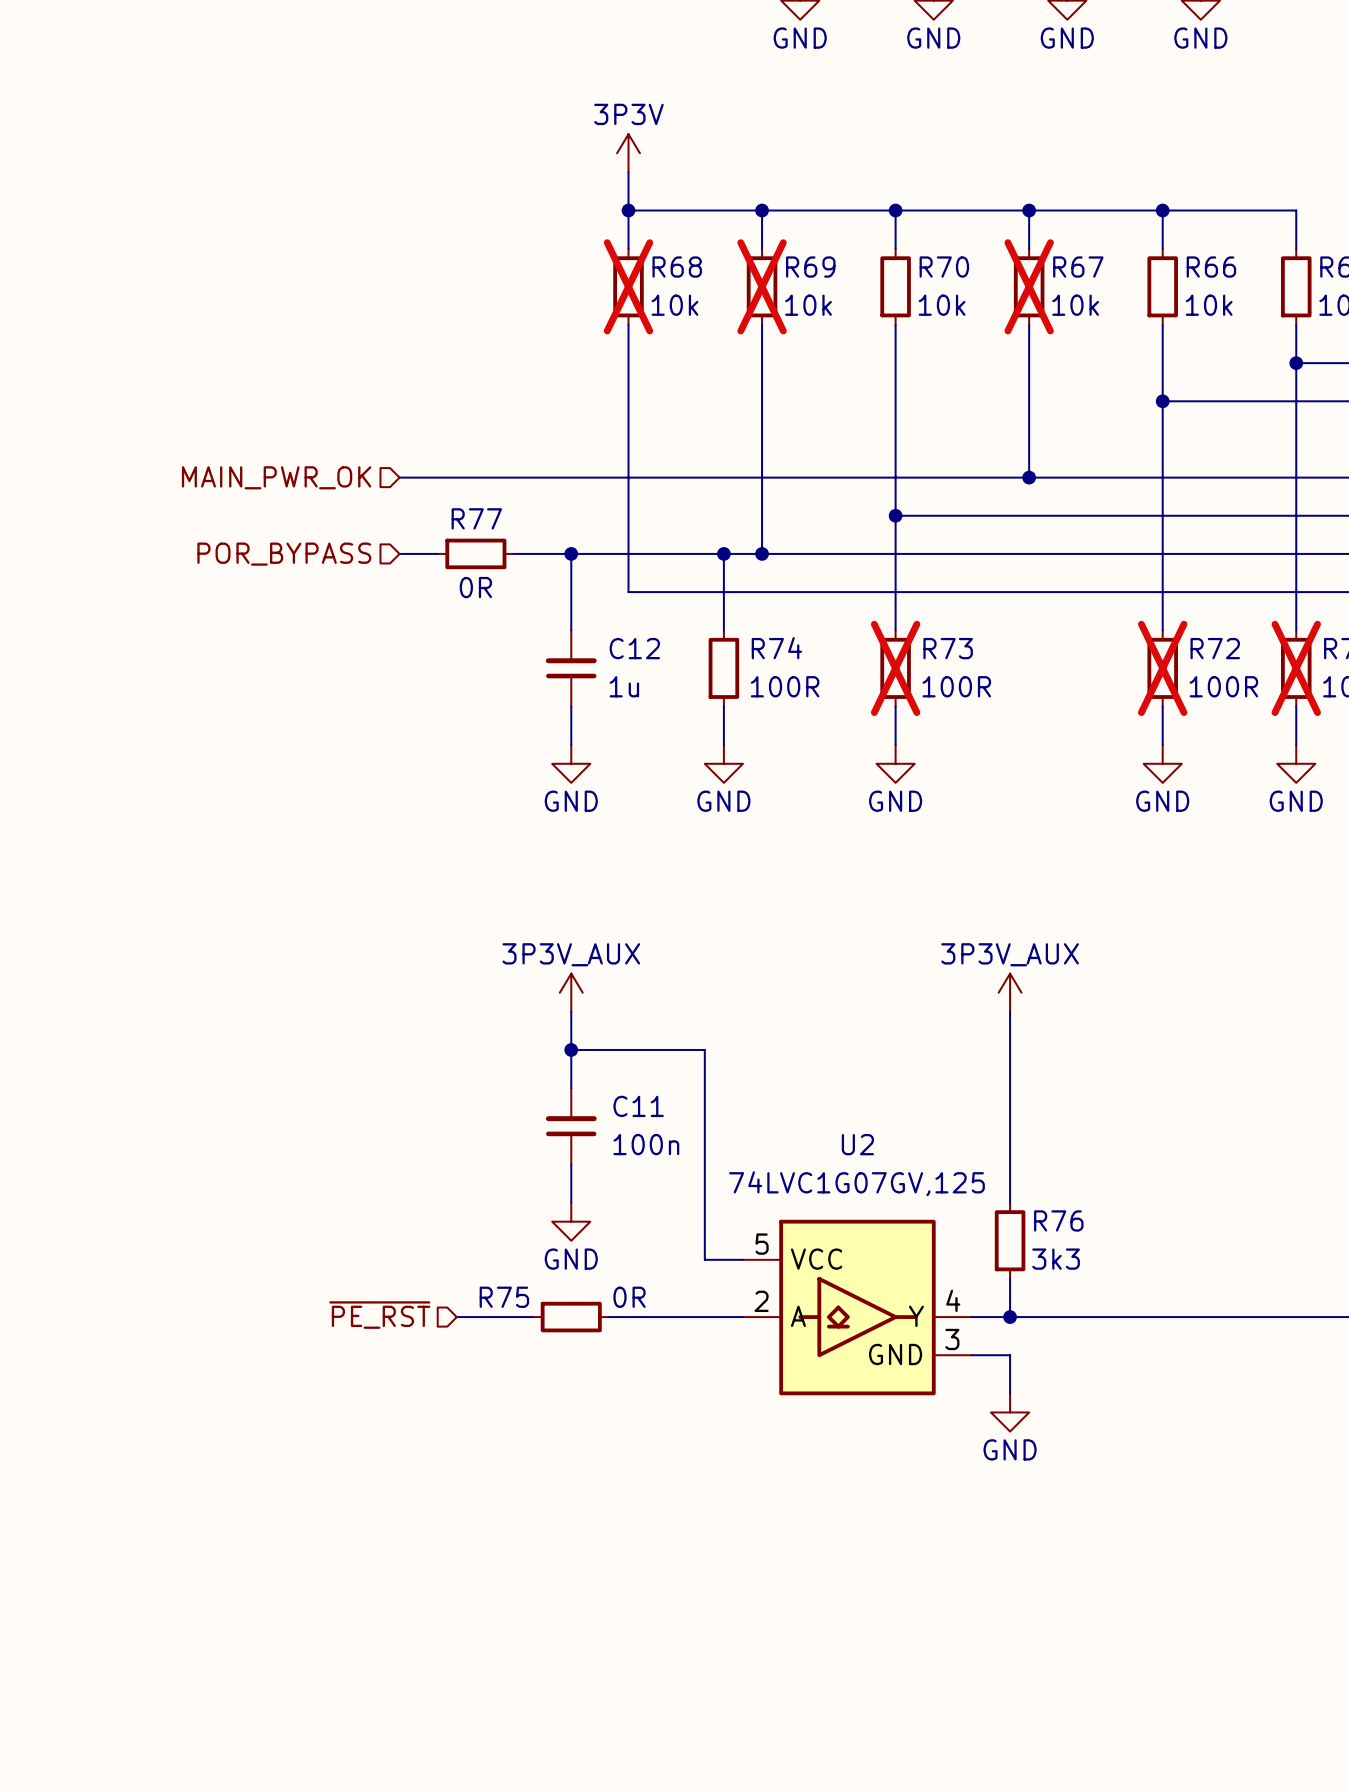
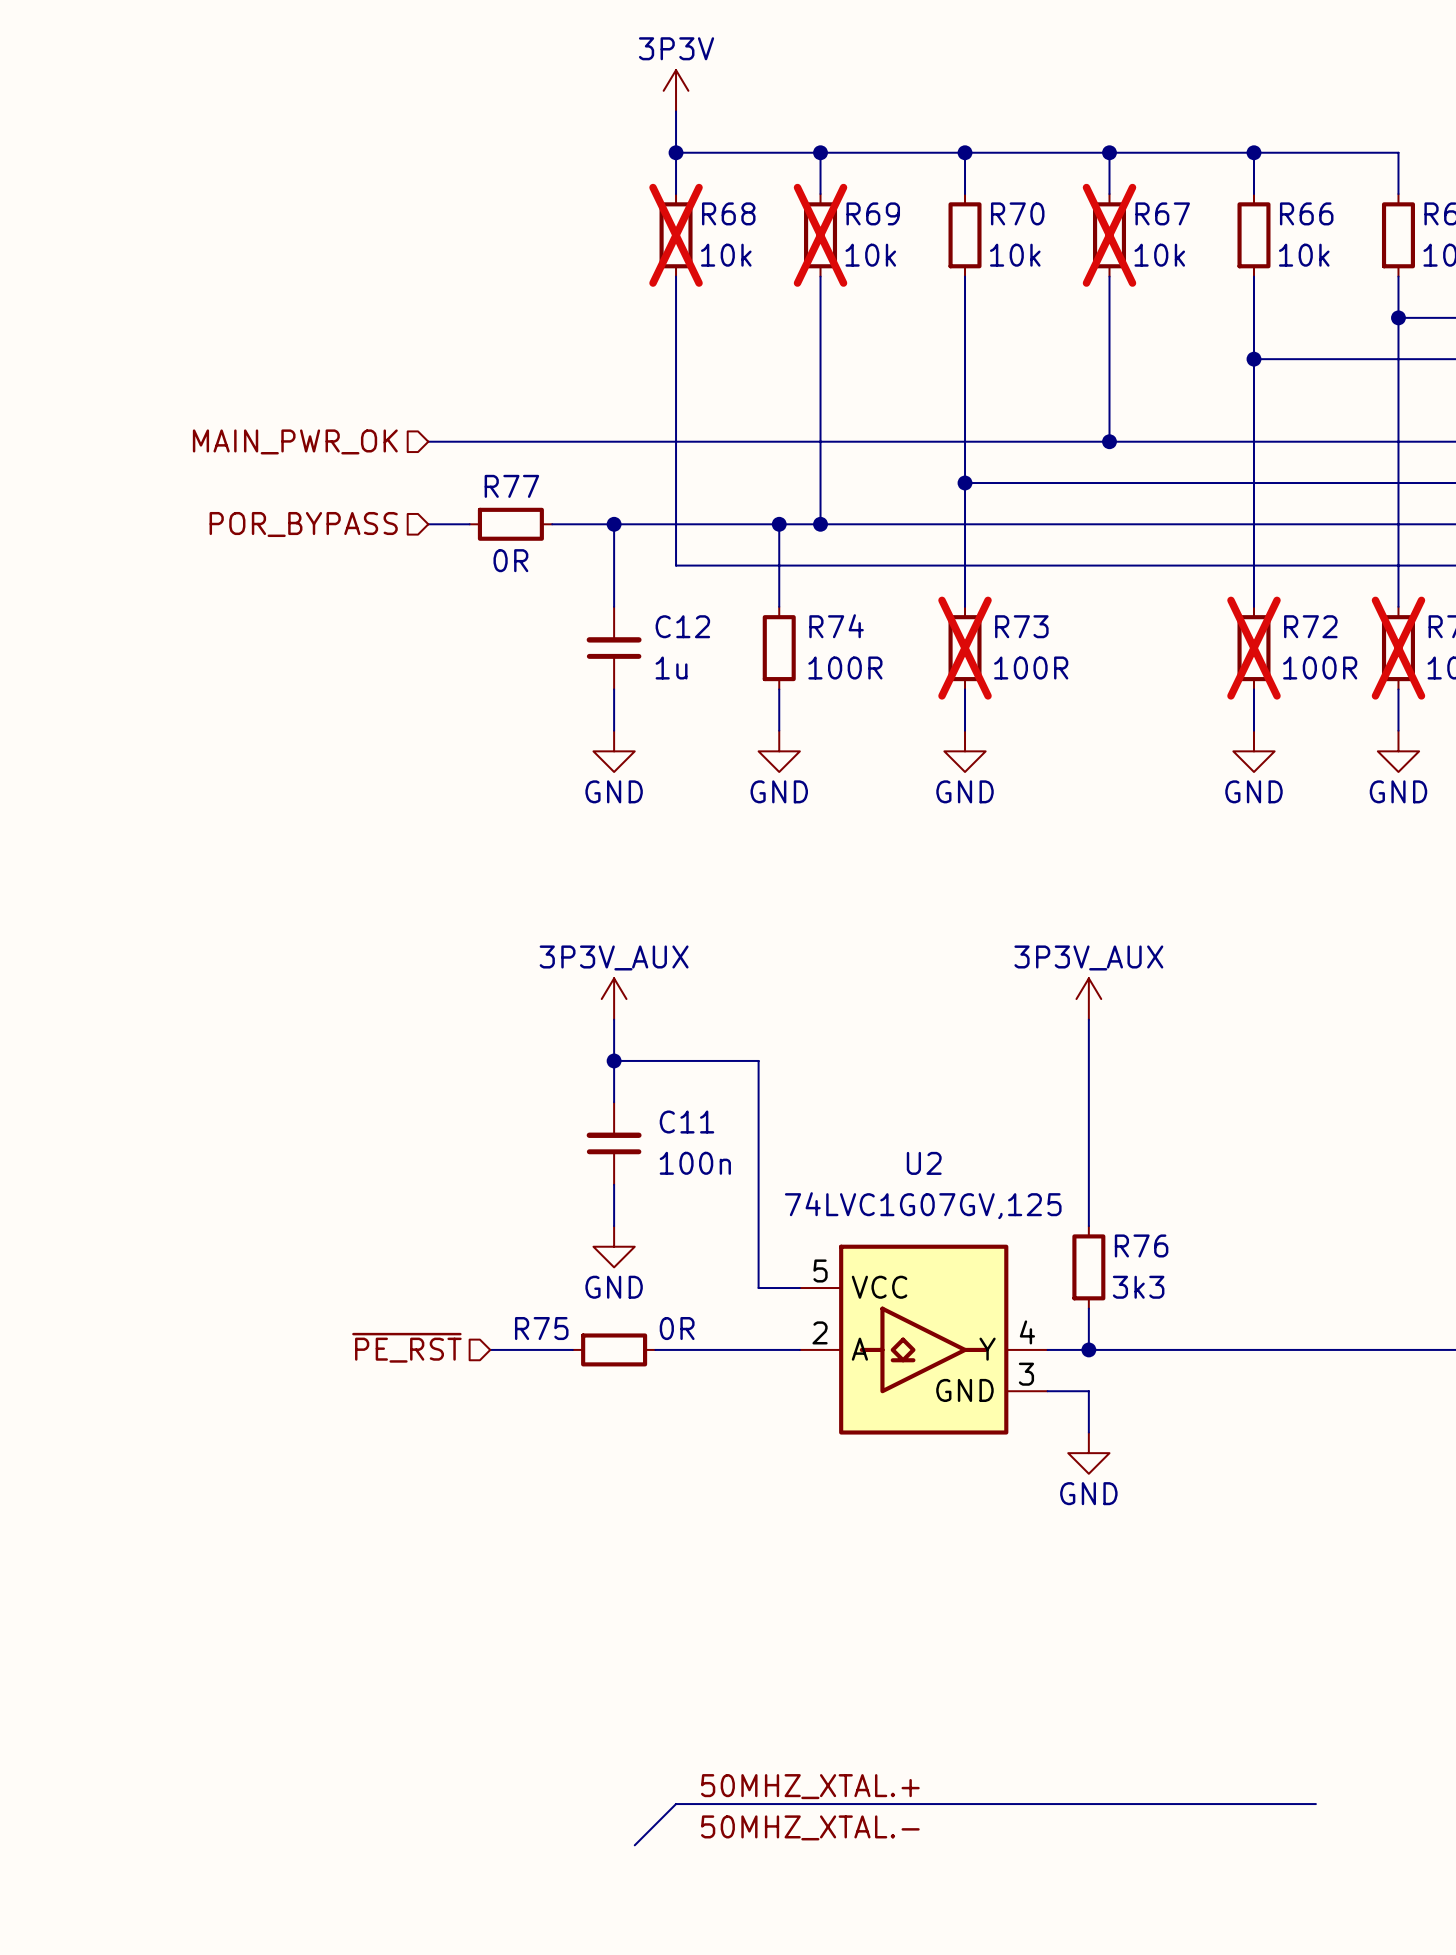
label: none -> 50MHZ_XTAL.+ (810, 1786)
wire: none -> (1315, 1804) (676, 1804) (634, 1845)
label: none -> 50MHZ_XTAL.- (810, 1827)

